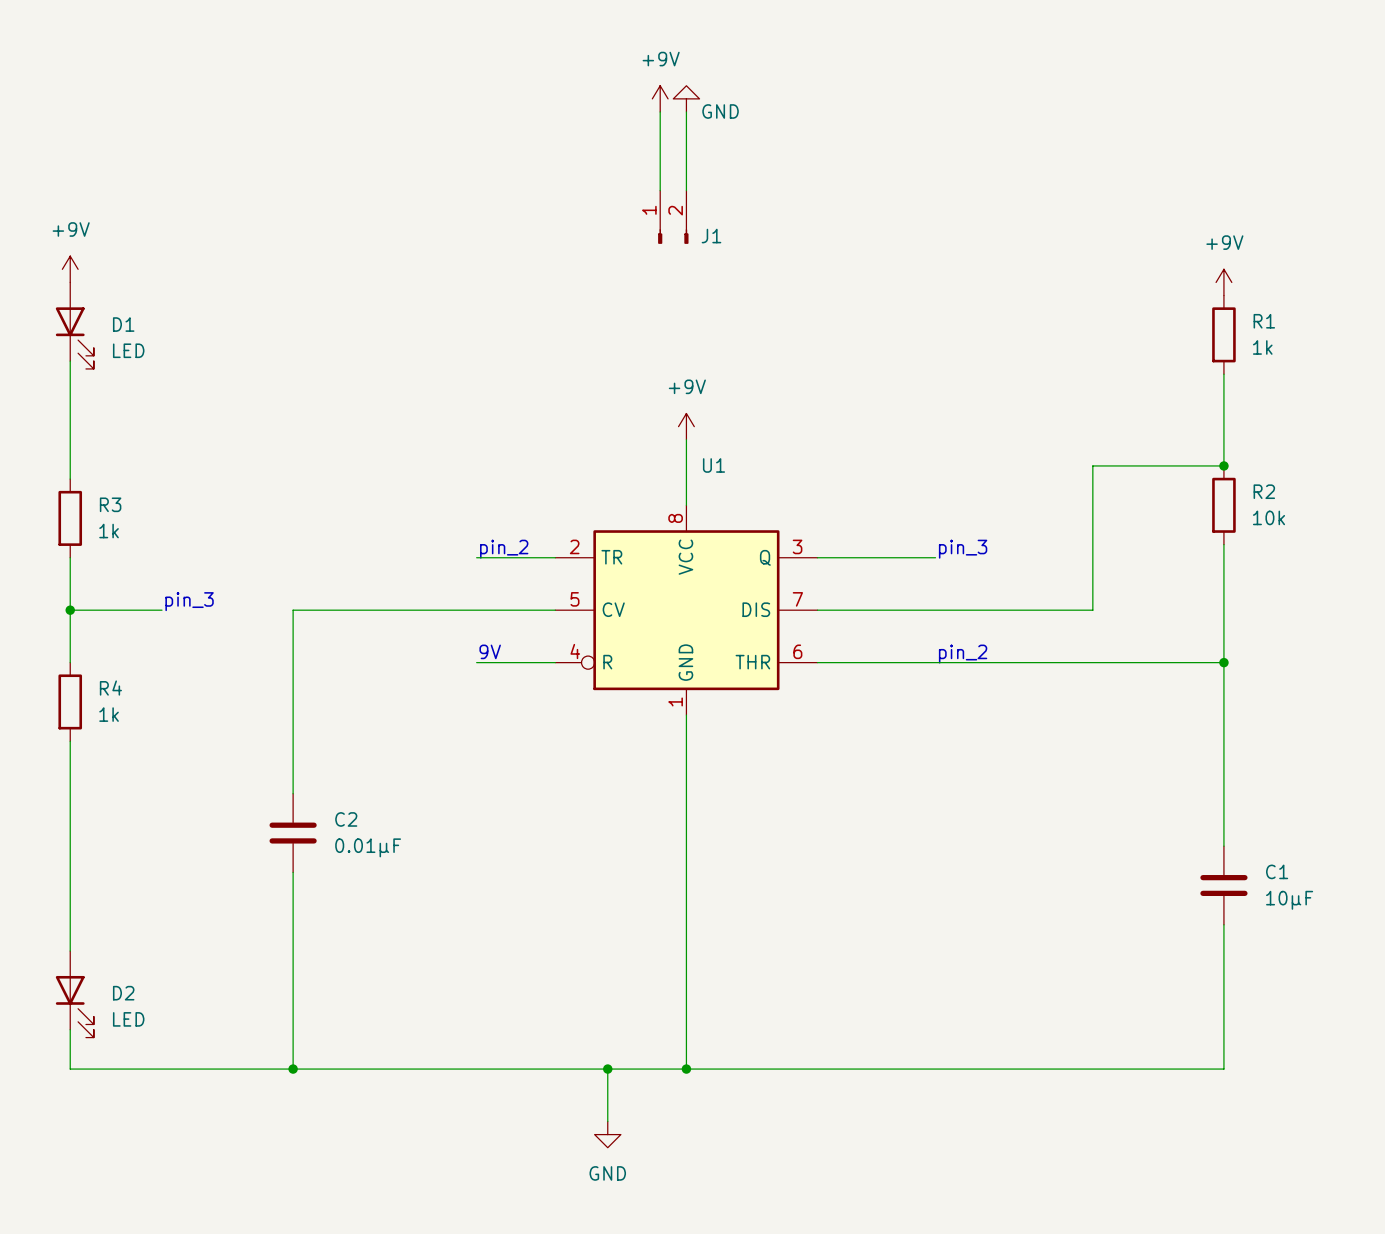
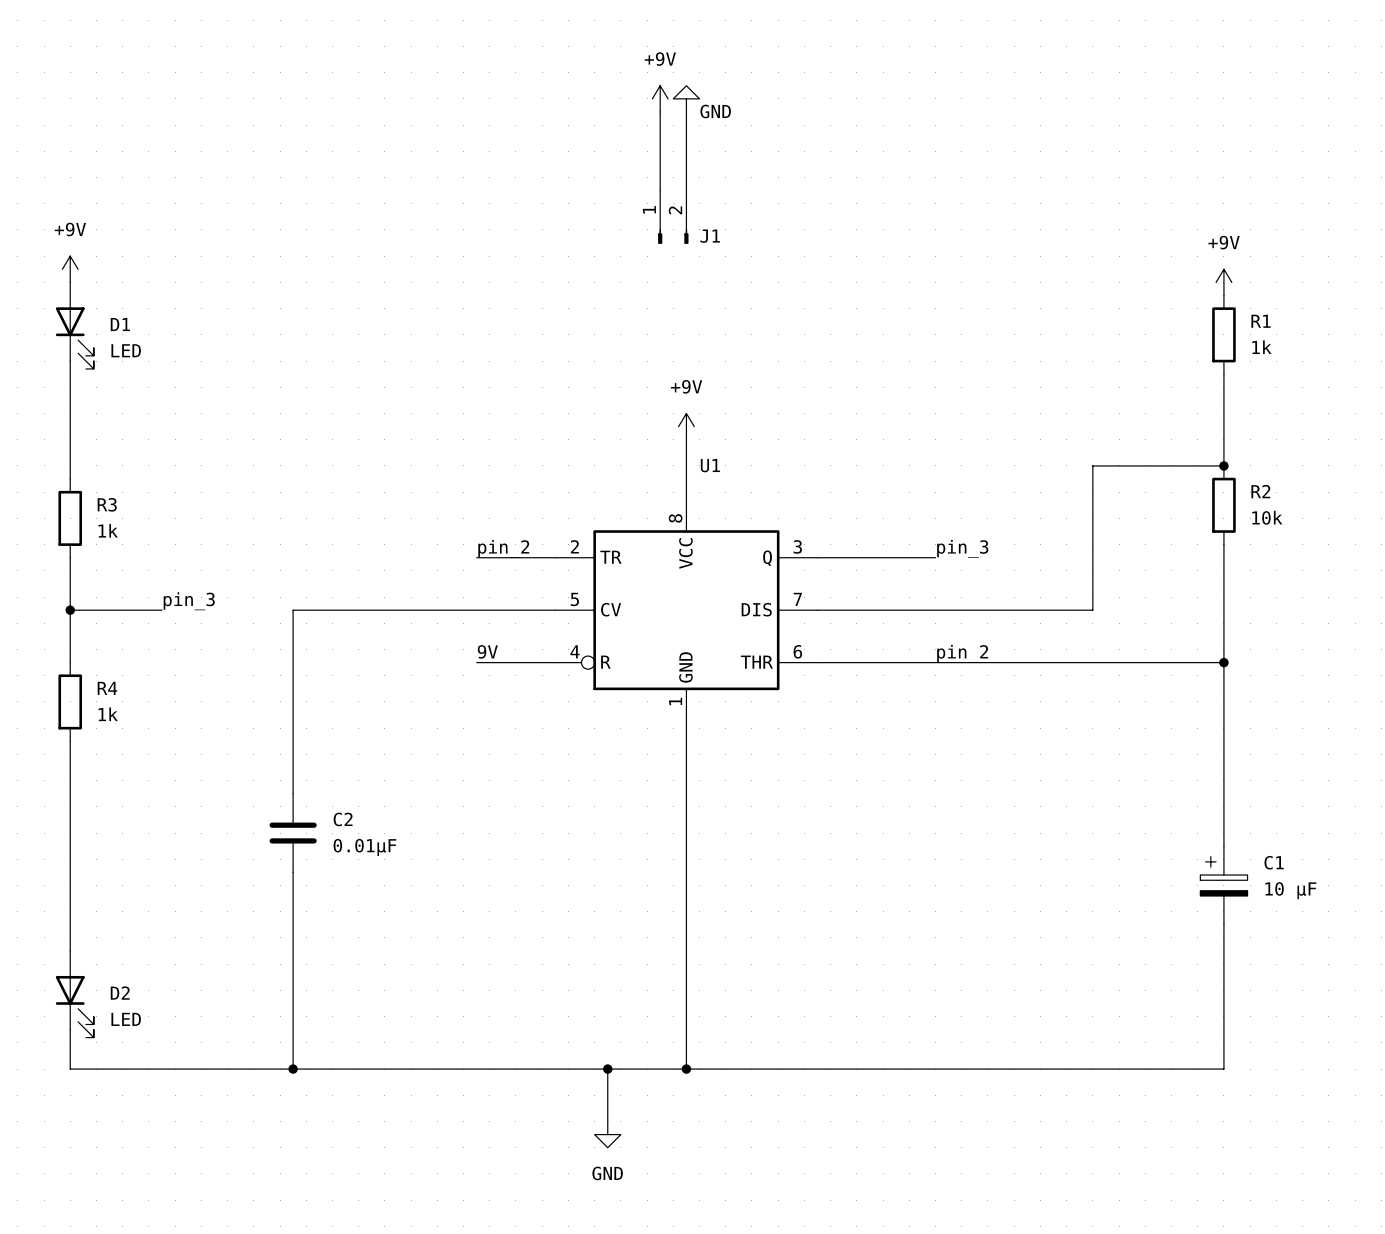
C1 symbol: [1200, 846, 1248, 925] -> [1200, 846, 1248, 925]
C1 value: 10µF (1289, 900) -> 10 µF (1290, 890)

